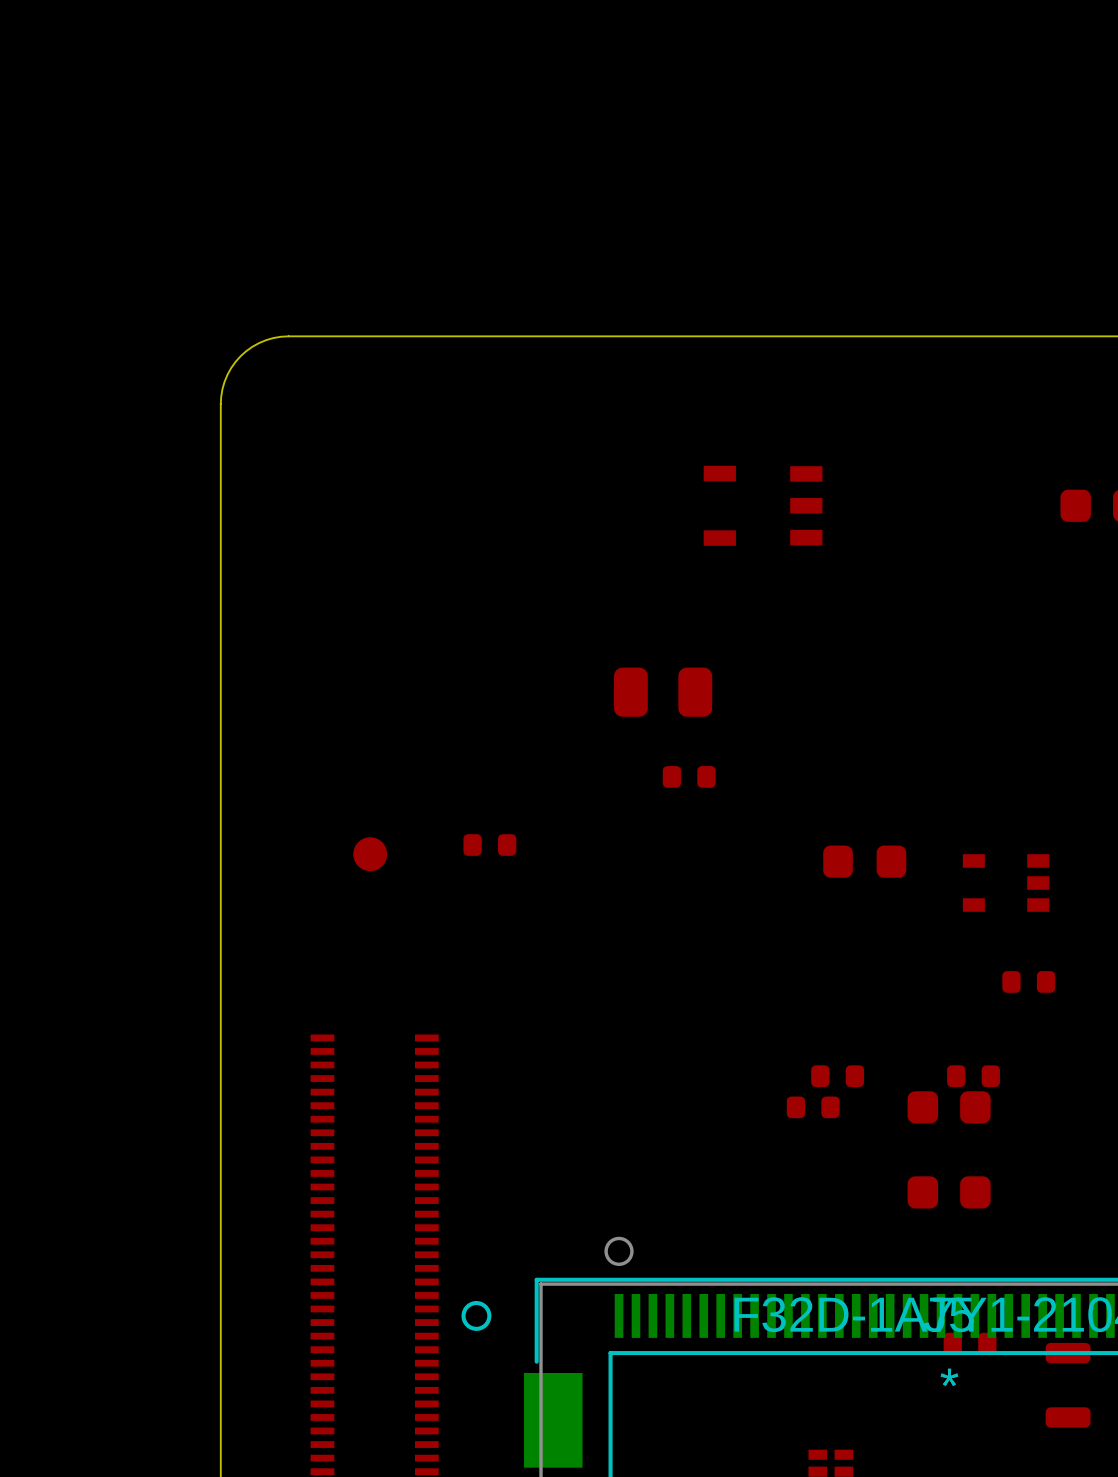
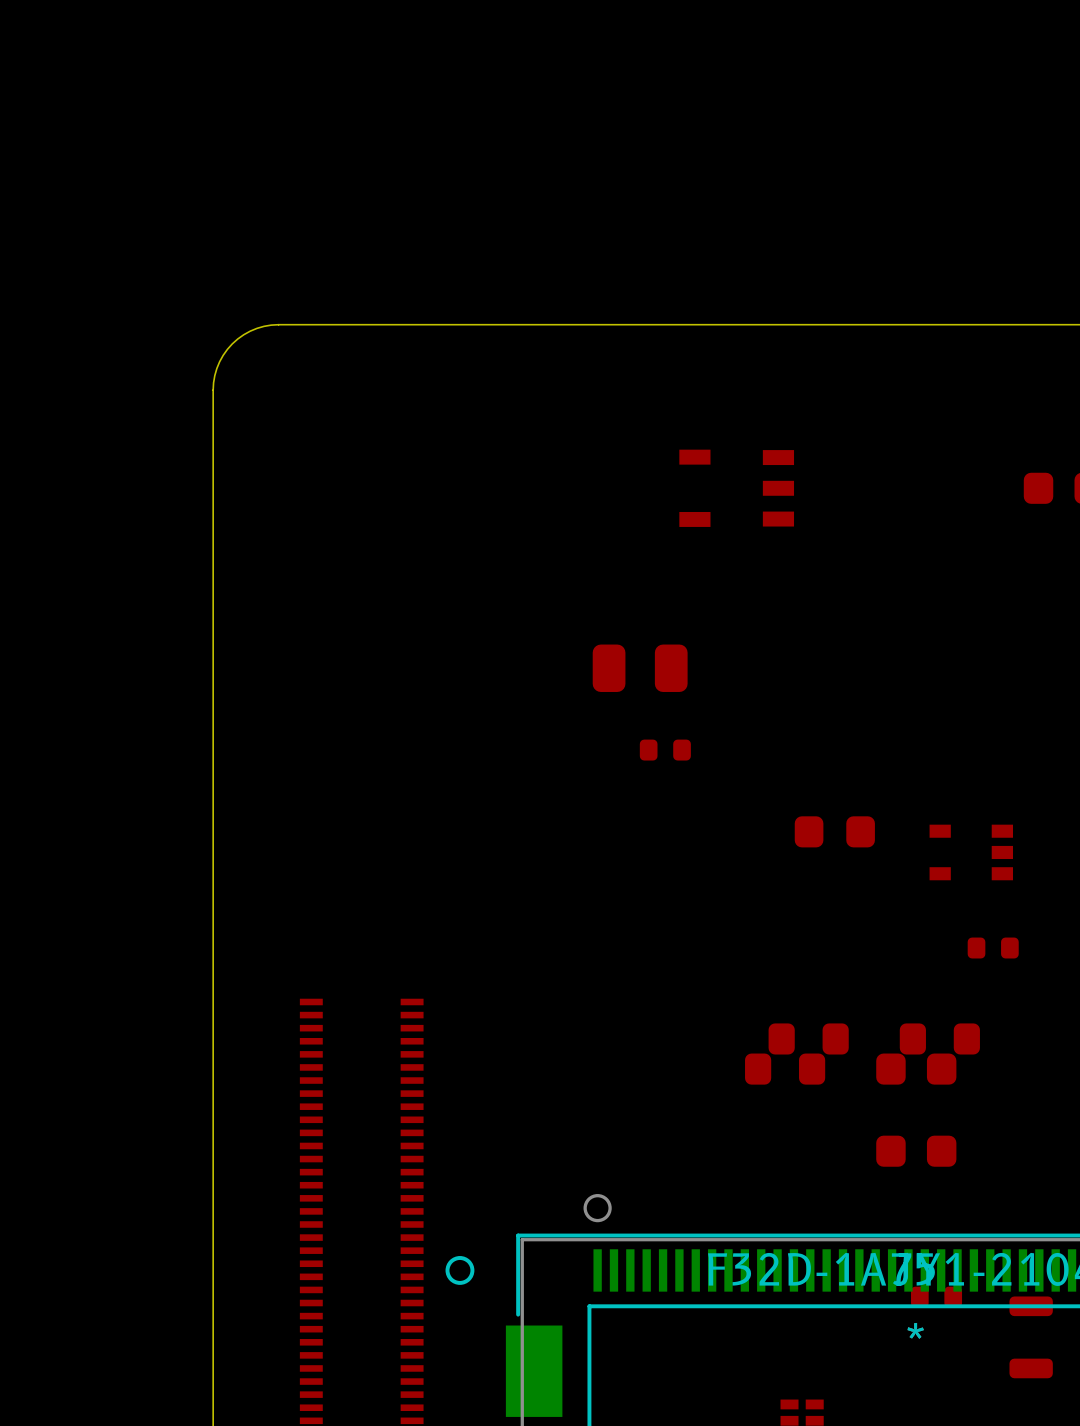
part: (489, 845) -> none
part: (370, 854) -> none
part footprint: [811, 1065, 865, 1088] -> [768, 1023, 849, 1055]
part footprint: [947, 1065, 1000, 1088] -> [899, 1023, 980, 1055]
part footprint: [786, 1096, 840, 1119] -> [745, 1053, 826, 1085]

